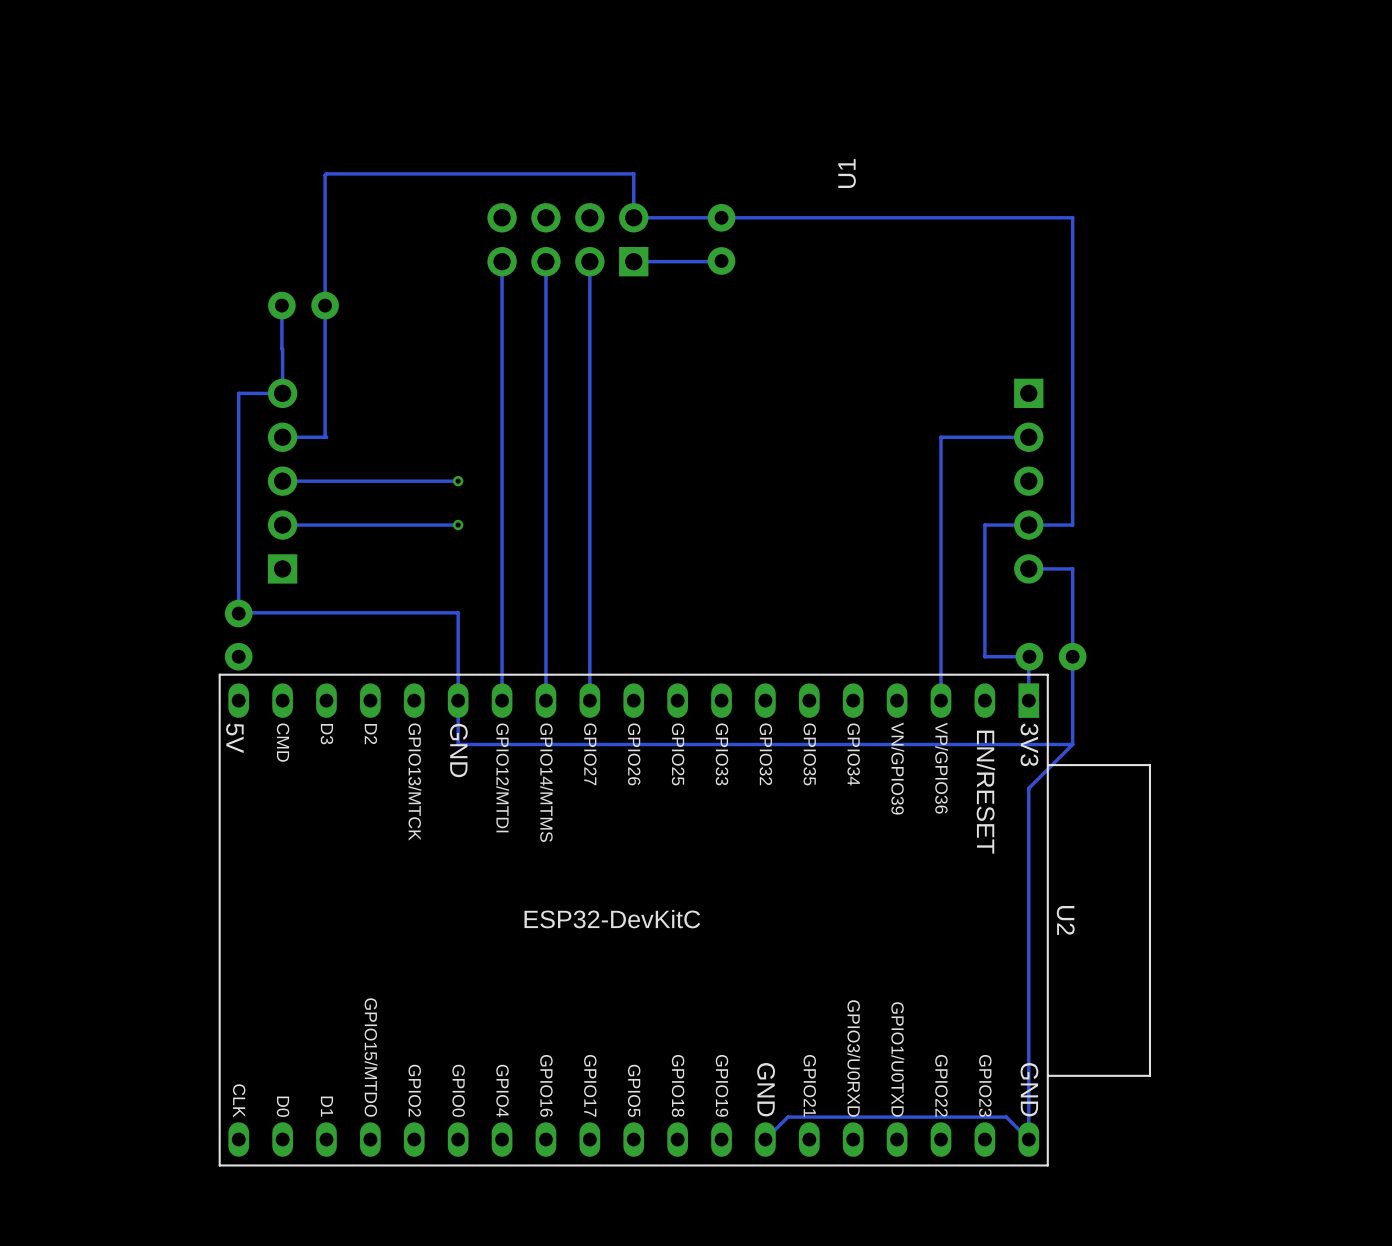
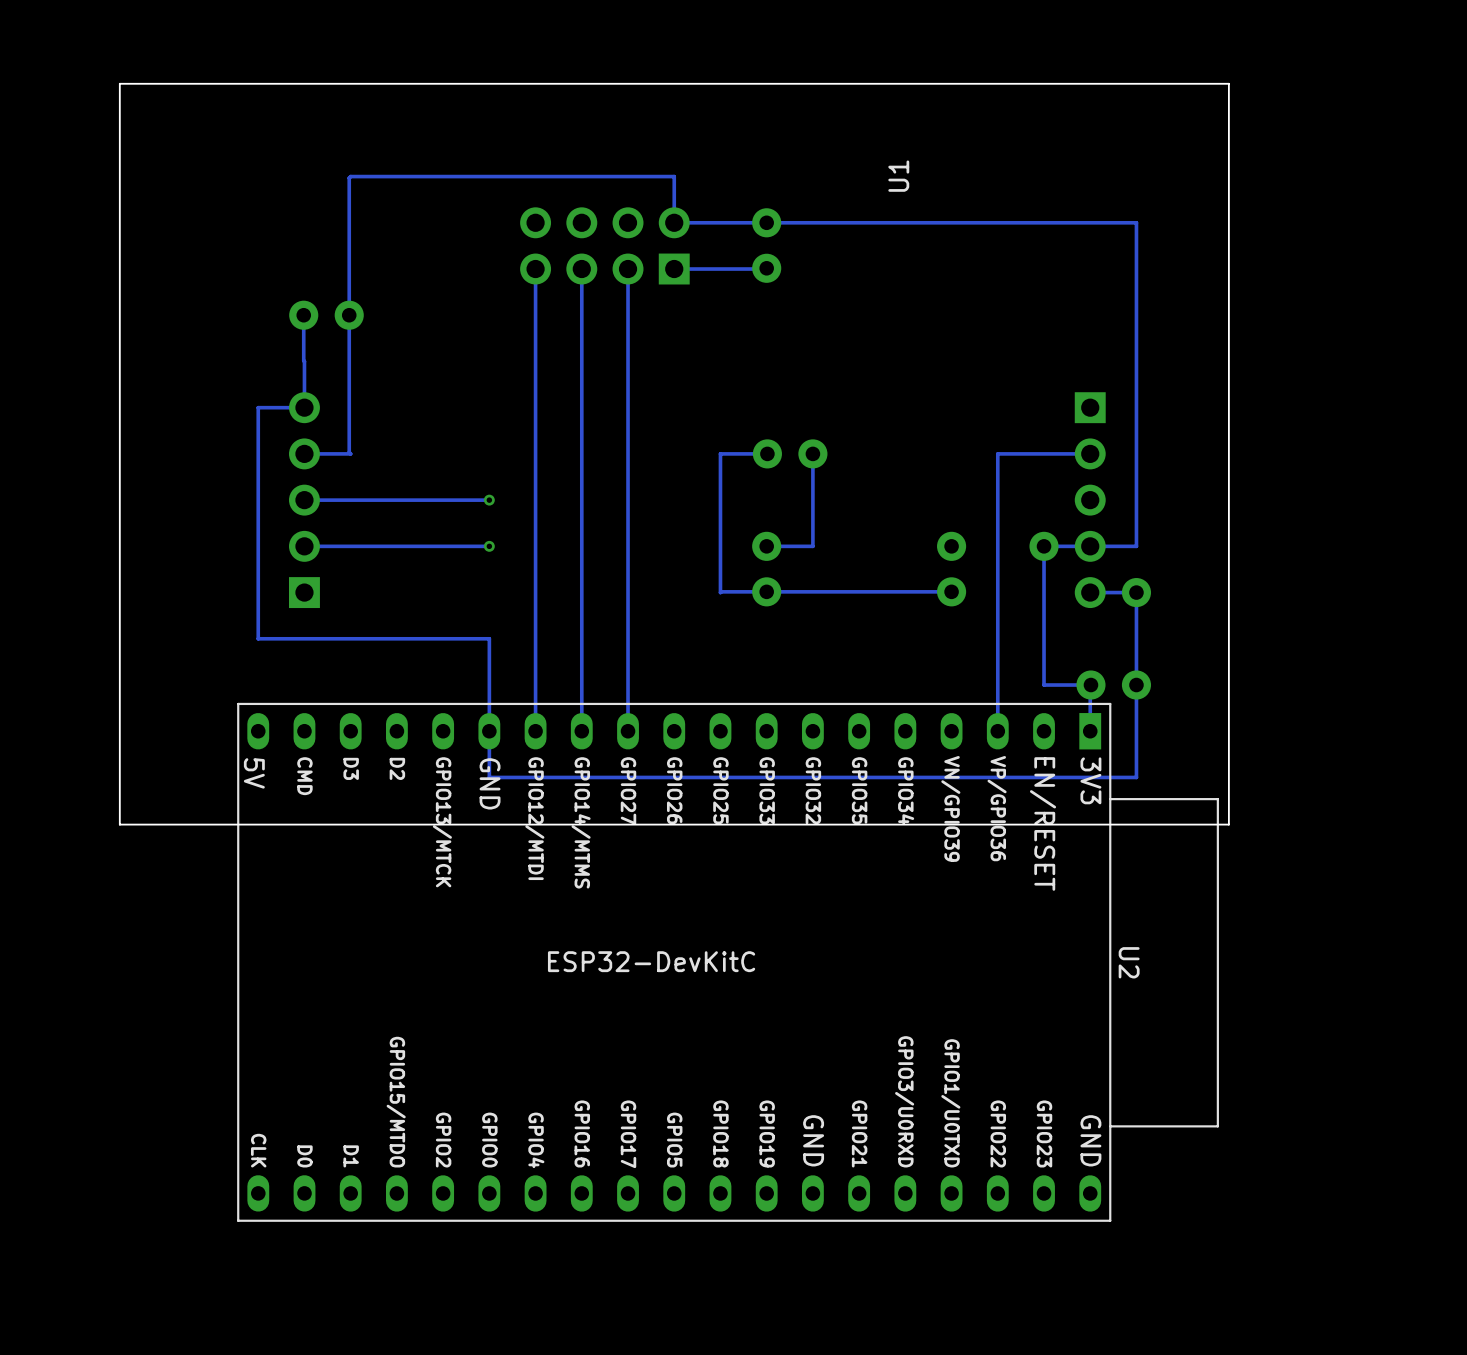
board edge: none -> (1228, 83) (119, 83) (119, 824) (1228, 824) (1228, 83)
track: none -> (767, 453) (720, 453) (720, 592) (951, 591)
part: none -> (790, 453)
track: none -> (812, 453) (812, 546) (766, 546)
via: none -> (1044, 546)
part: none -> (766, 569)
part: none -> (951, 569)
via: none -> (1136, 592)
part: (238, 635) -> none
track: (1072, 744) (1028, 788) (1028, 1139) (1006, 1117) (787, 1117) (765, 1139) -> none

